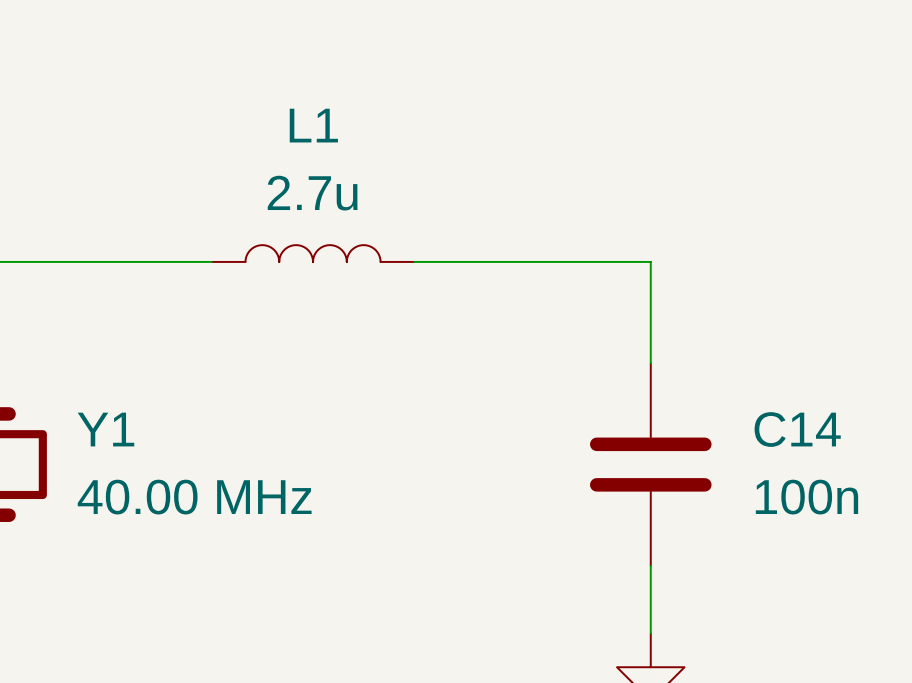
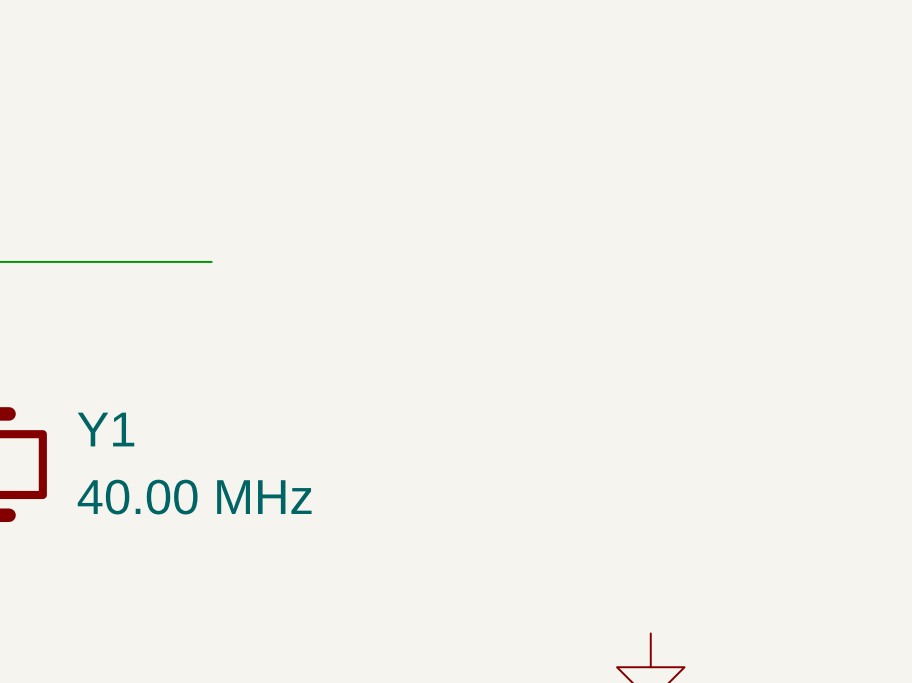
L1: 2.7u (313, 253) -> none
wire: (414, 261) (650, 261) (650, 363) -> none
C14: 100n (650, 464) -> none
wire: (650, 565) (650, 633) -> none

